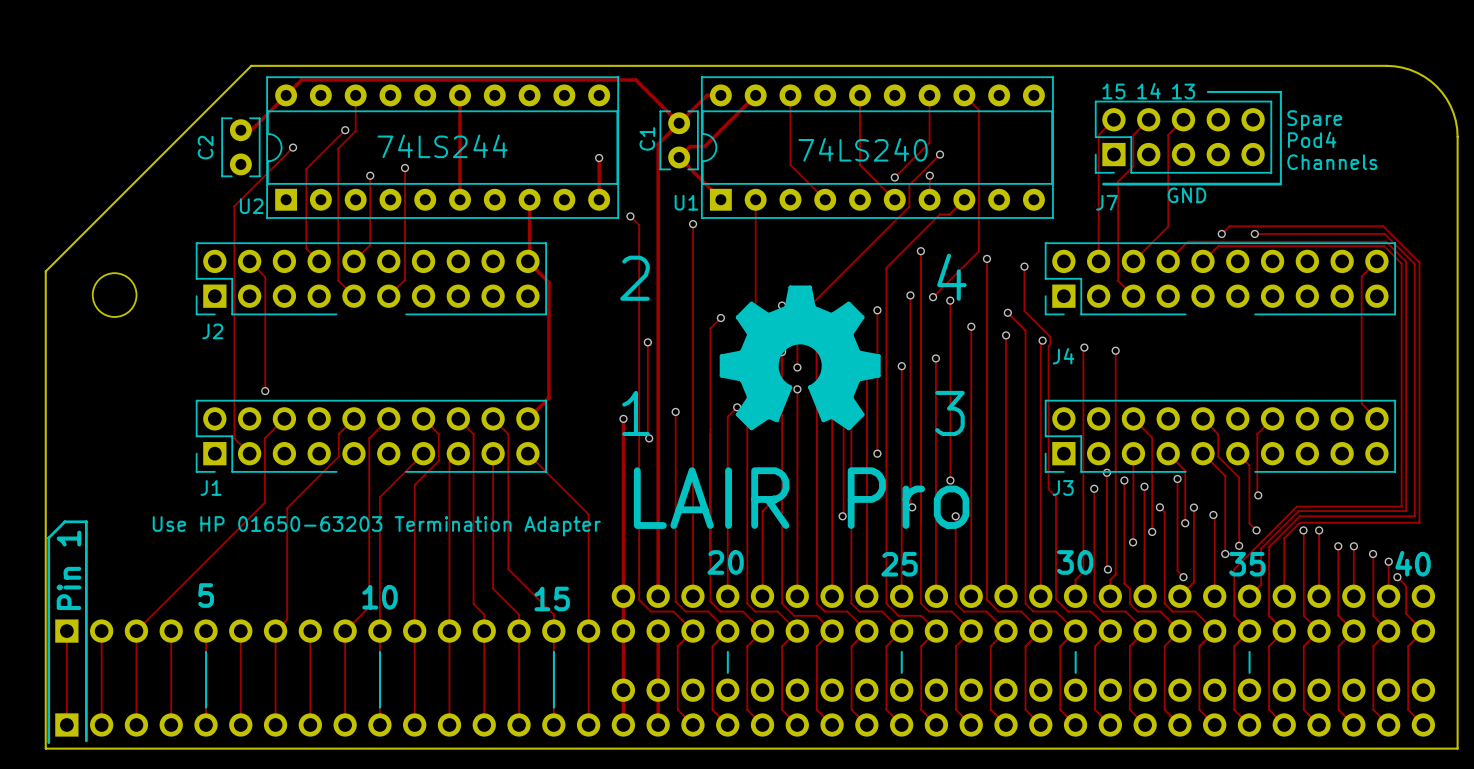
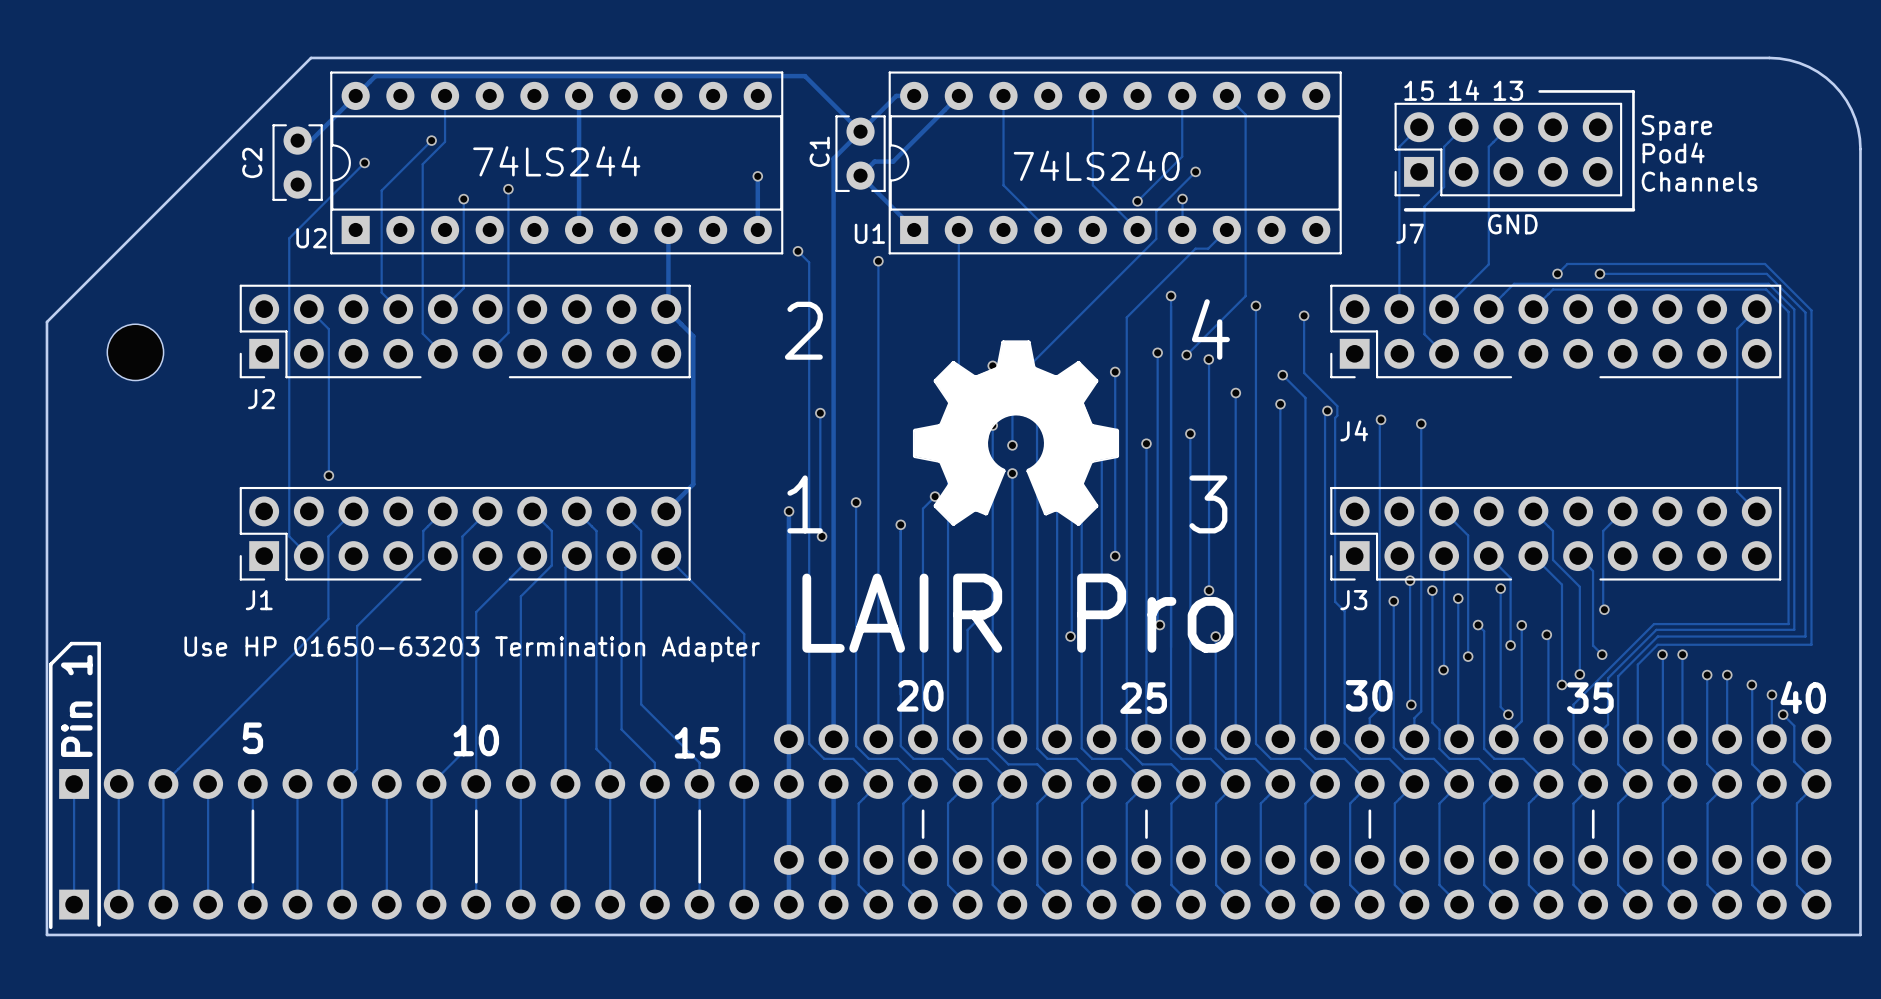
track: (720, 318) (710, 328) (710, 429) -> none
via: (720, 318) -> none
via: none -> (900, 524)

